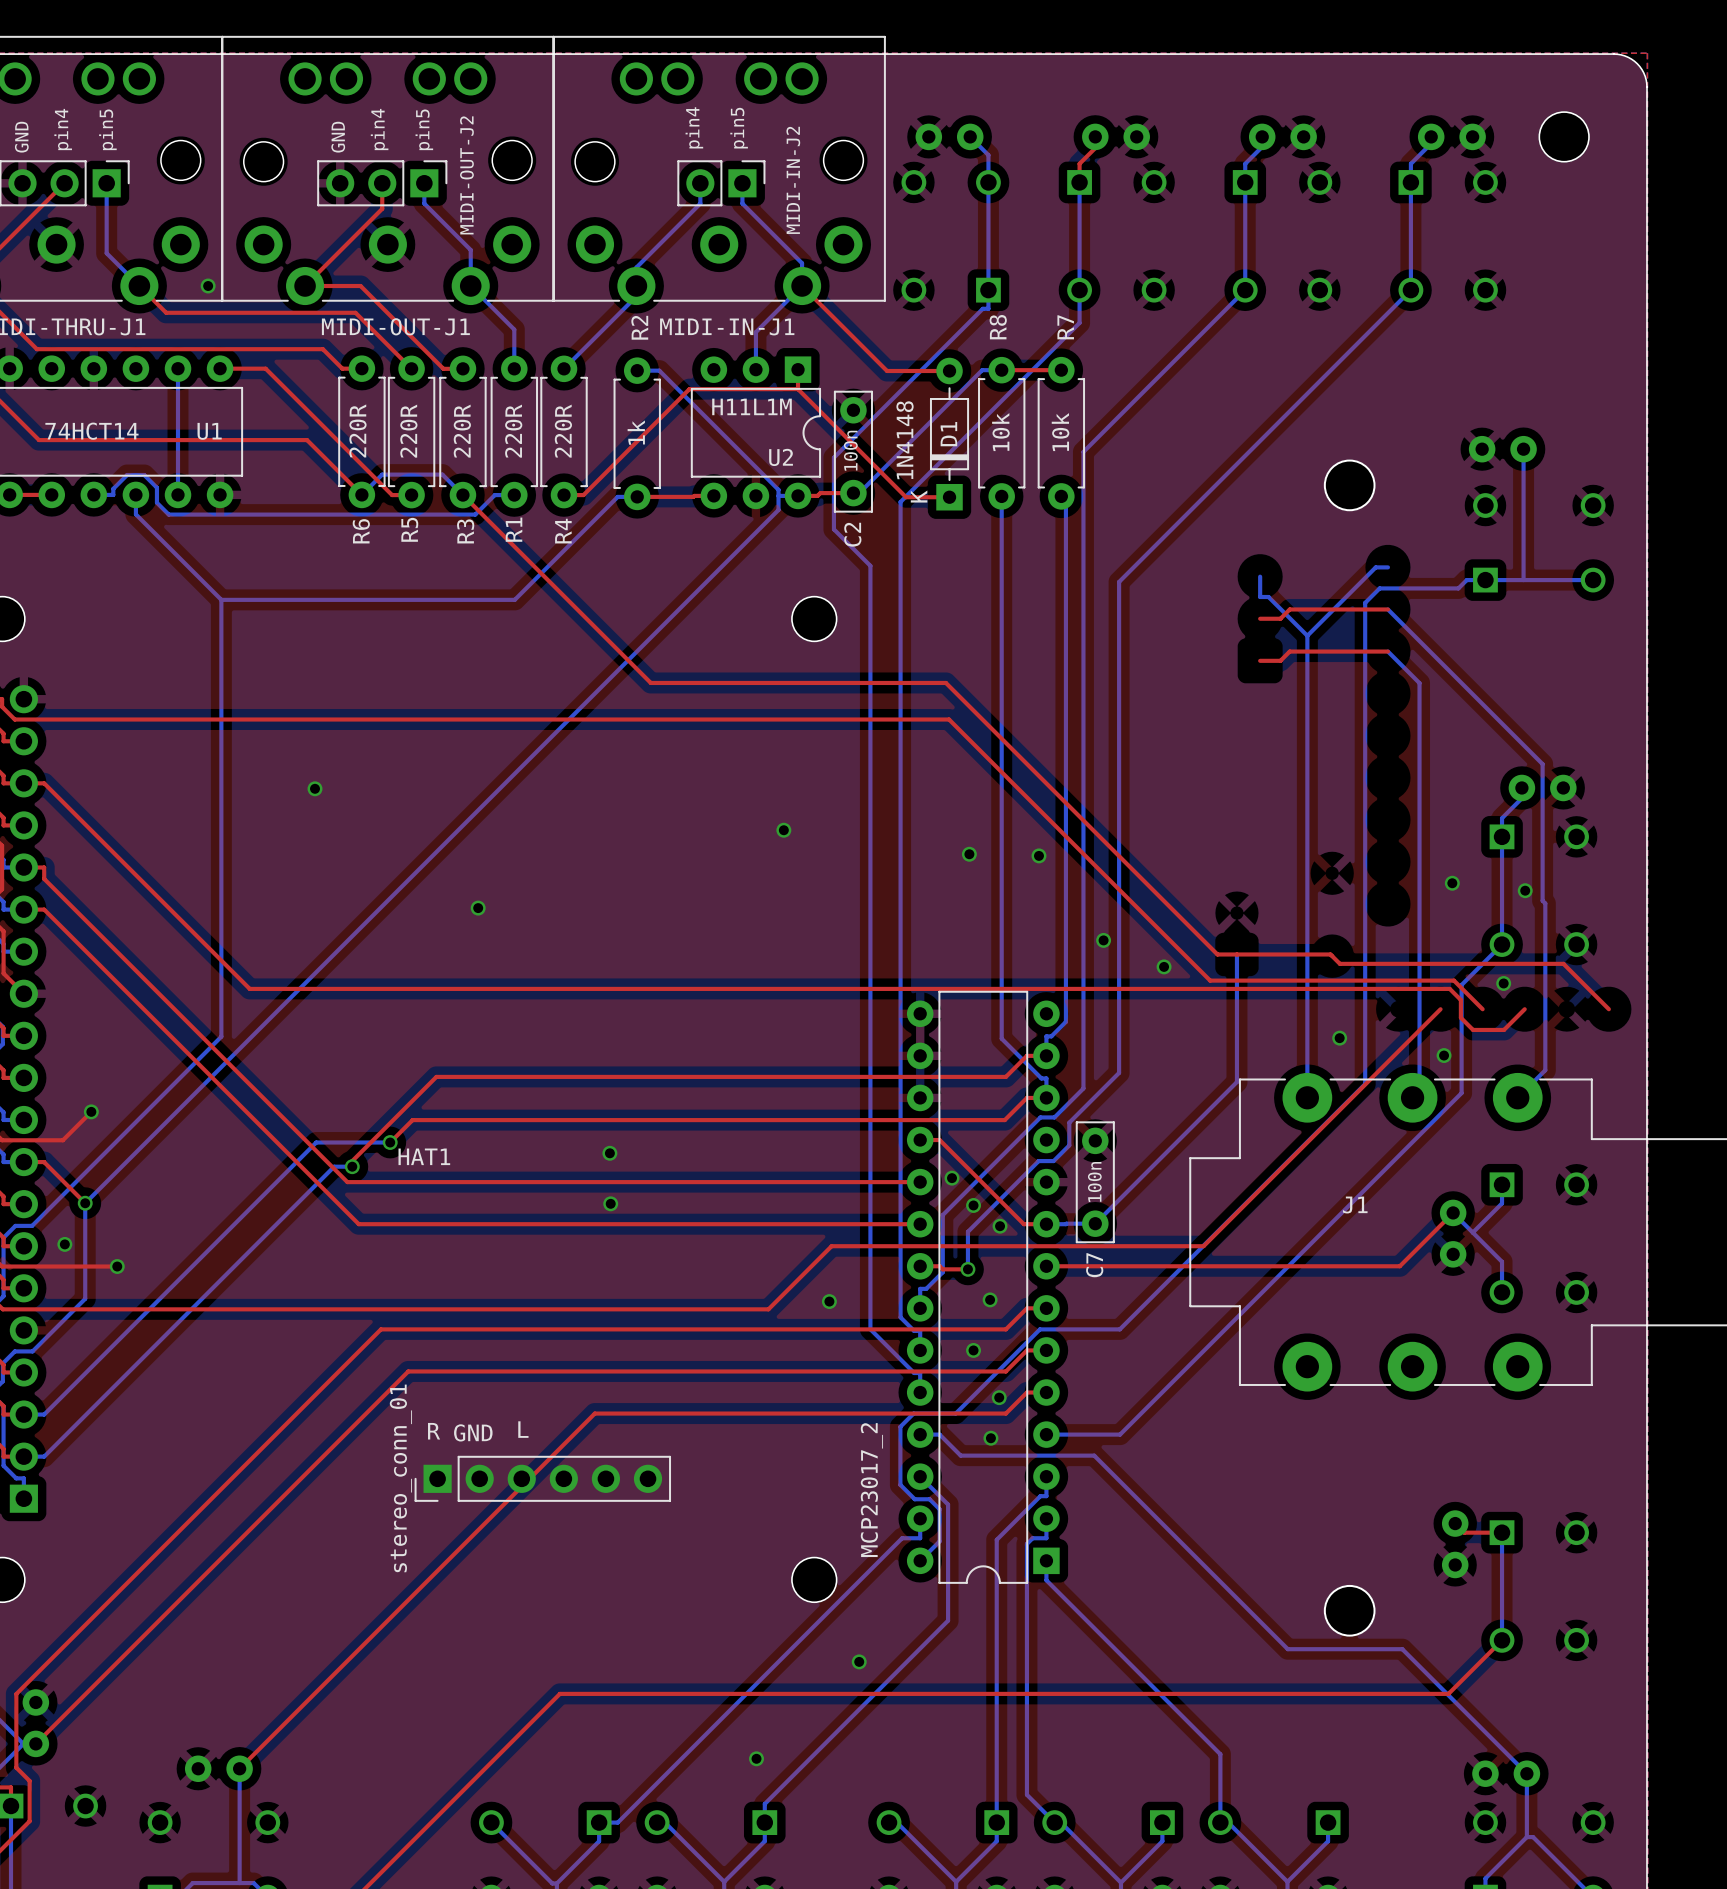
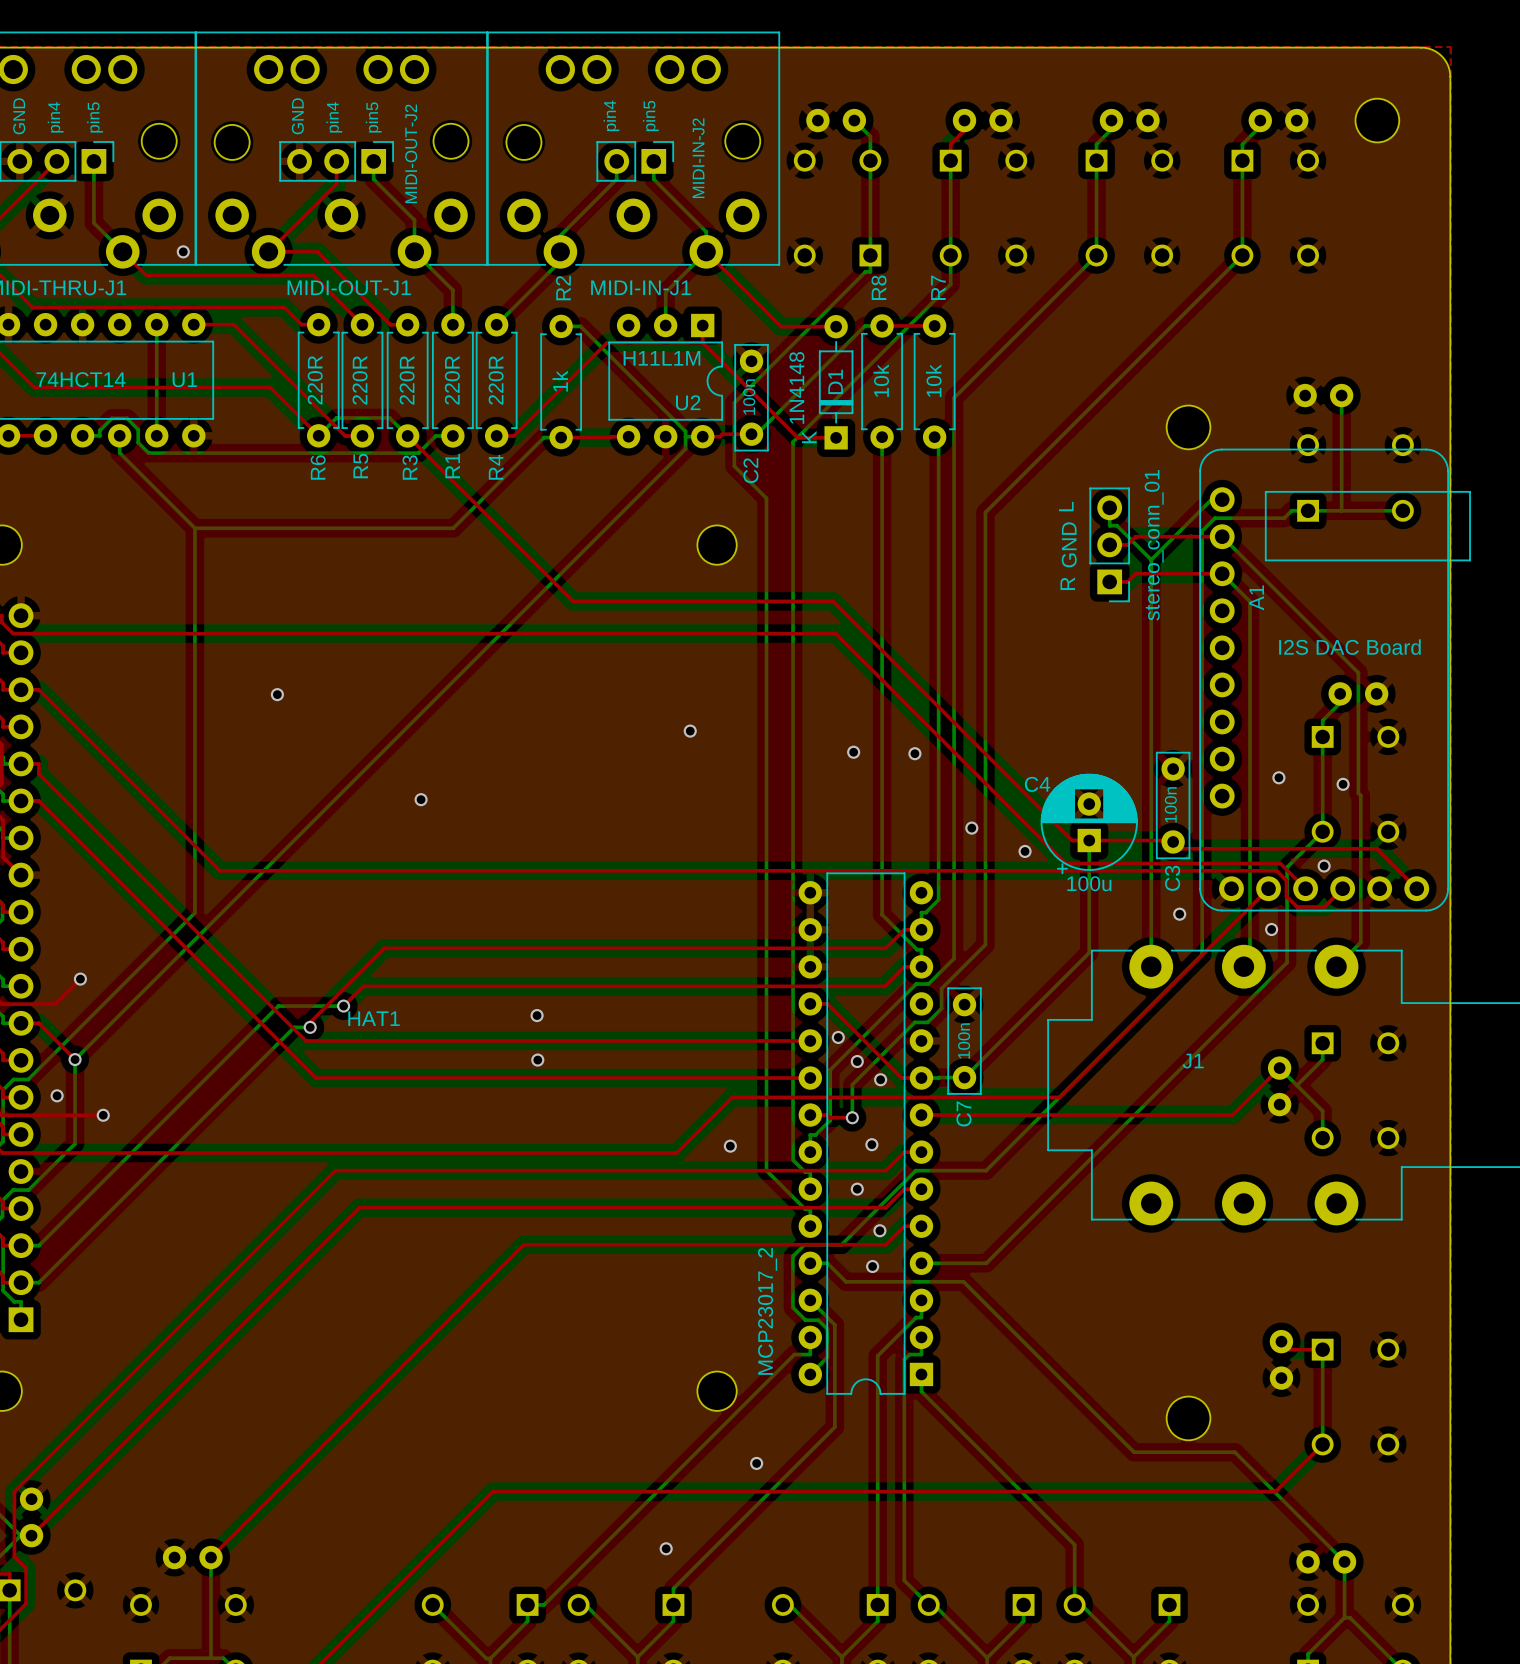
text: none -> L (1066, 506)
text: none -> GND (1069, 544)
text: none -> R (1067, 583)
text: none -> I2S DAC Board (1349, 647)
A1: none -> (1335, 680)
C3: none -> 100n (1173, 805)
C4: none -> 100u (1089, 823)
text: L (523, 1429) -> none
text: R (434, 1431) -> none
text: GND (473, 1432) -> none
stereo_conn_01 footprint: [414, 1455, 672, 1502] -> [1089, 487, 1130, 603]
stereo_conn_01 name position: stereo_conn_01 (400, 1478) -> stereo_conn_01 (1154, 545)

